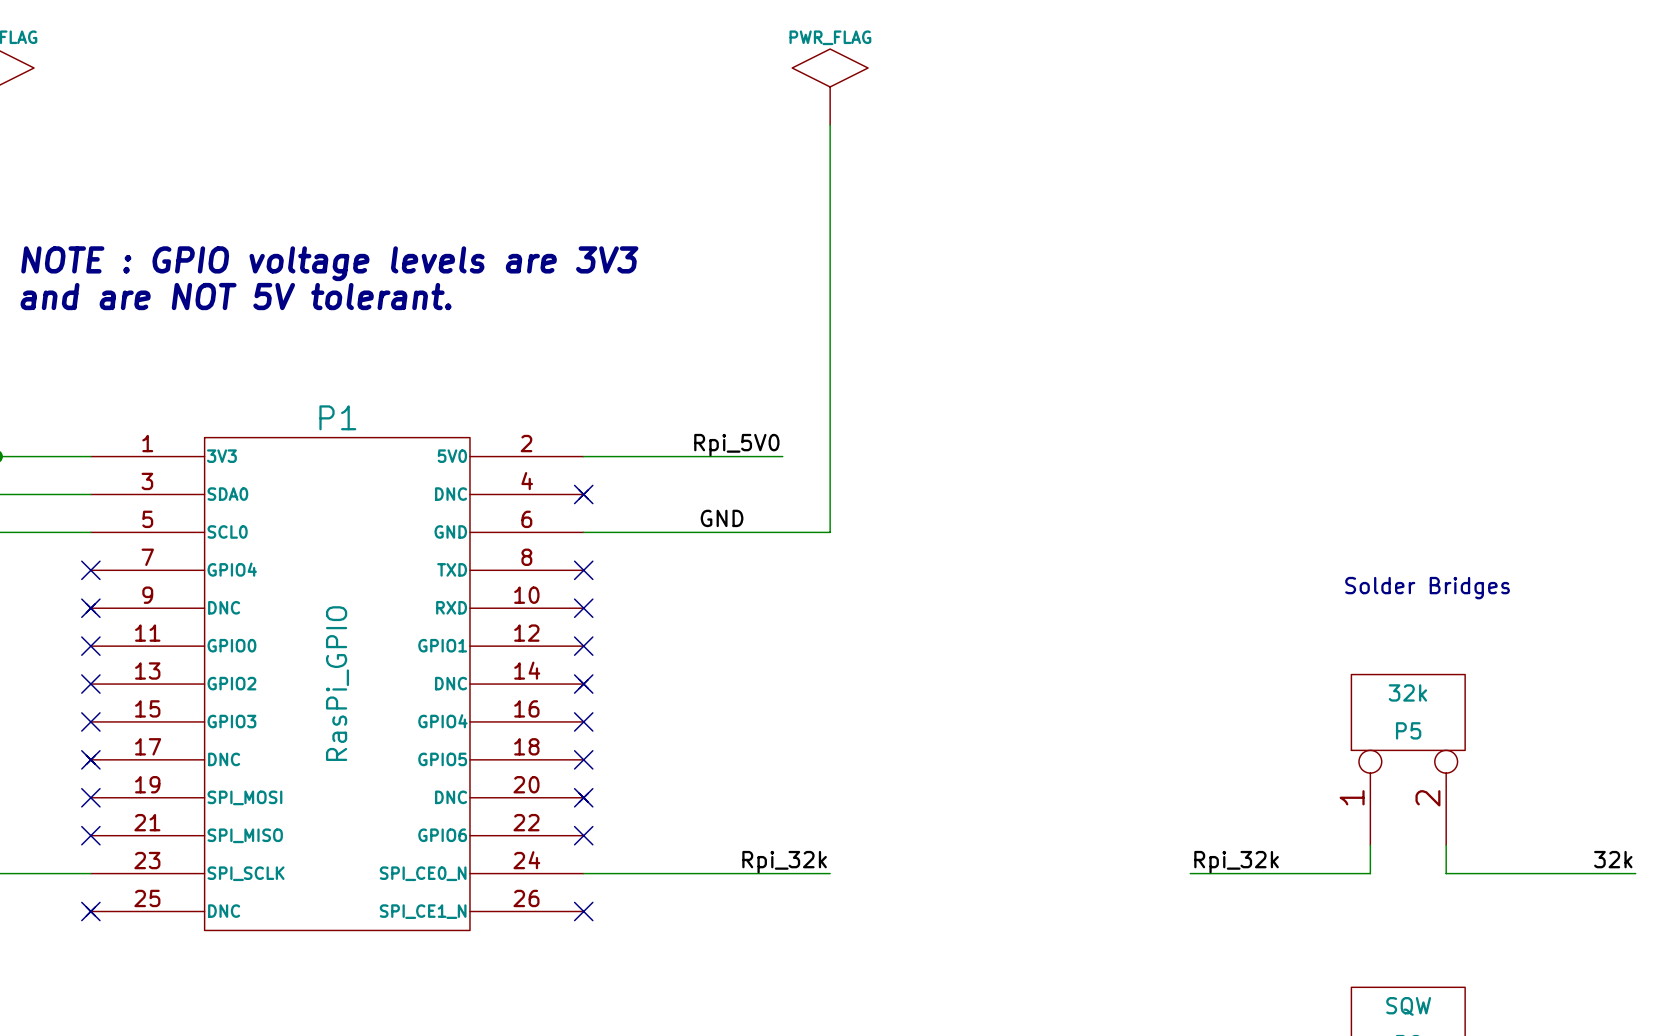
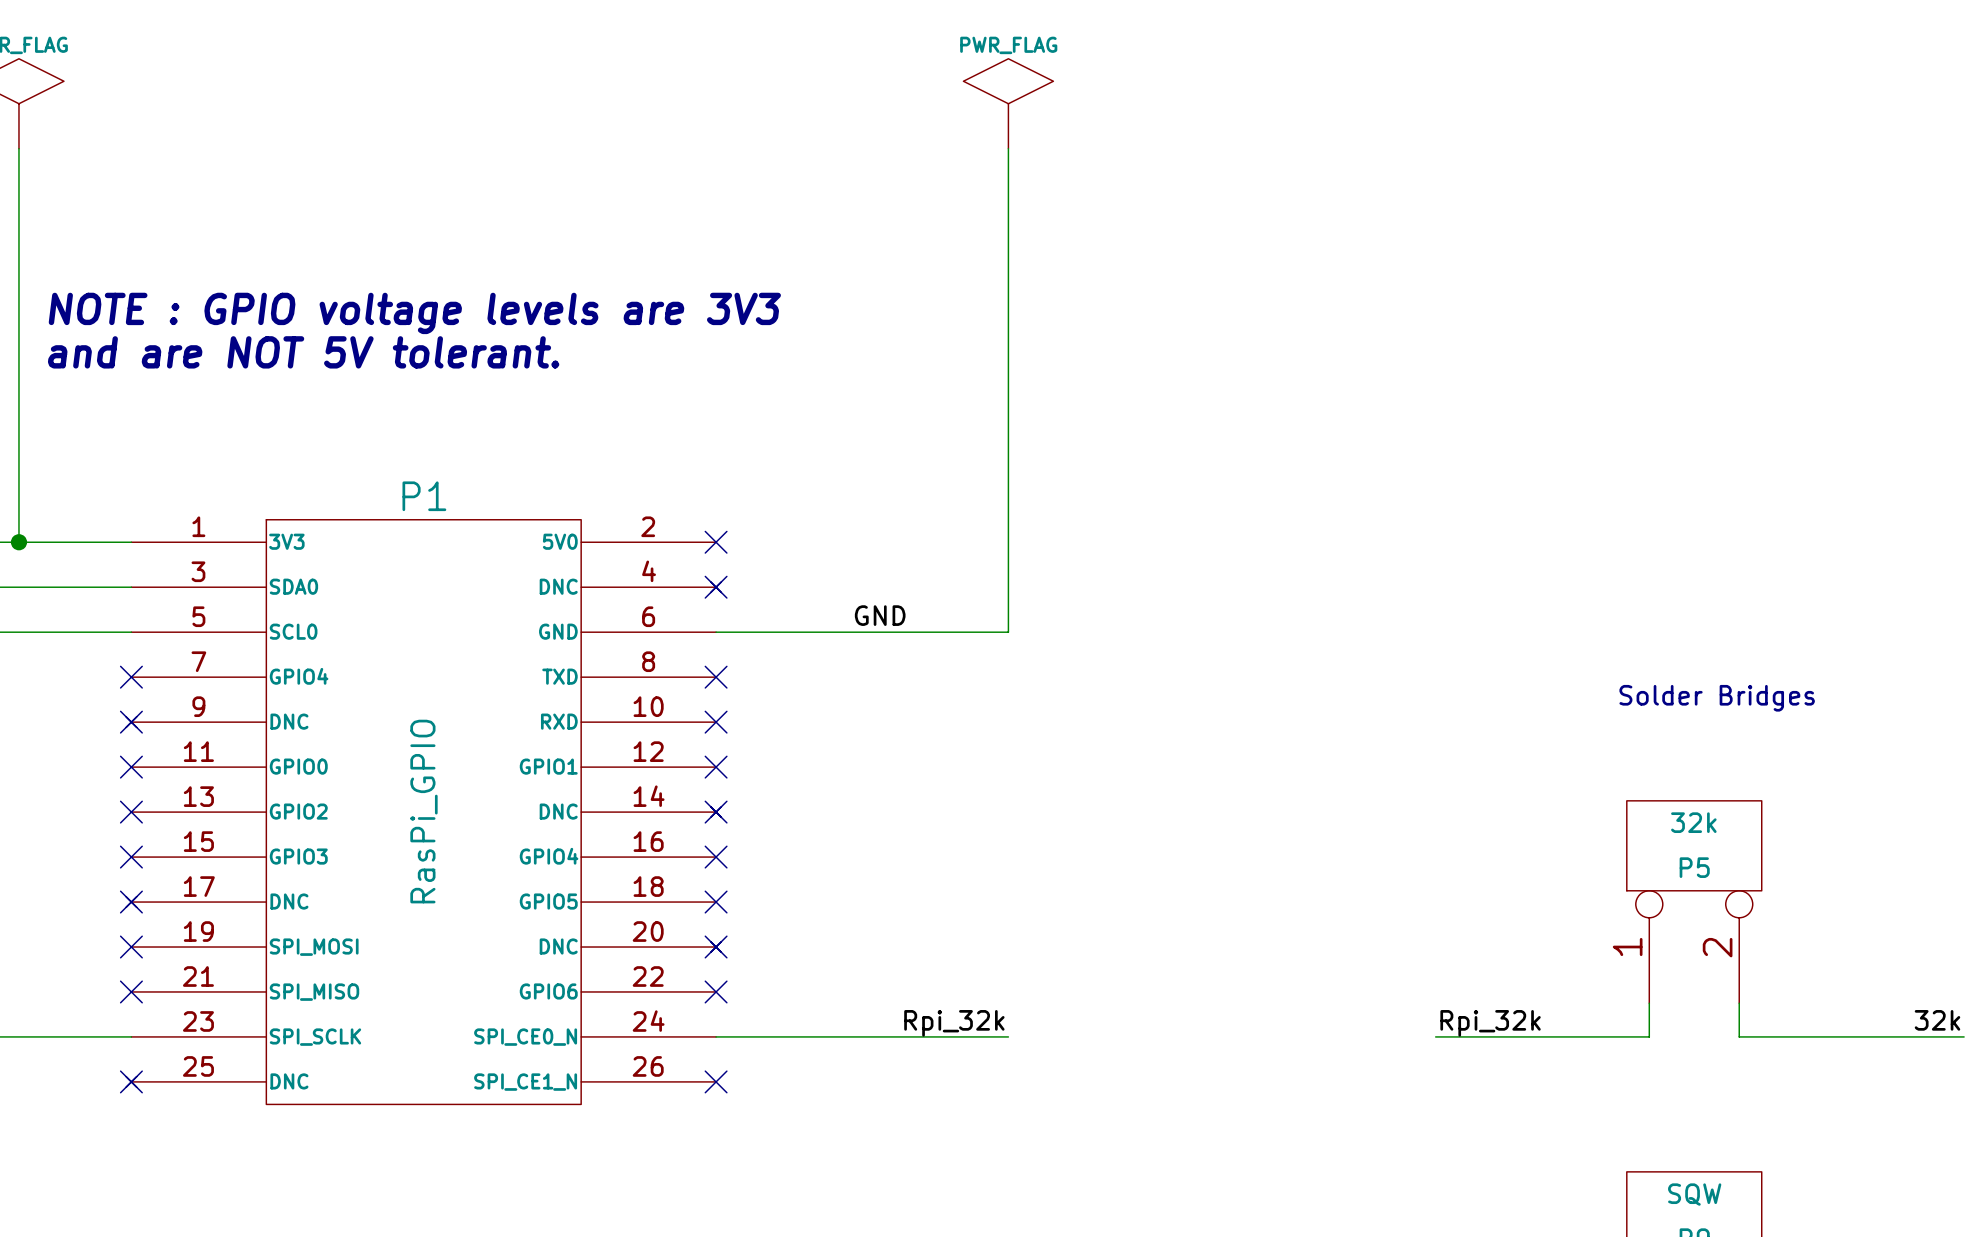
label: Rpi_5V0 (736, 445) -> none
wire: (583, 456) (782, 456) -> none
no-connect mark: none -> (716, 542)

